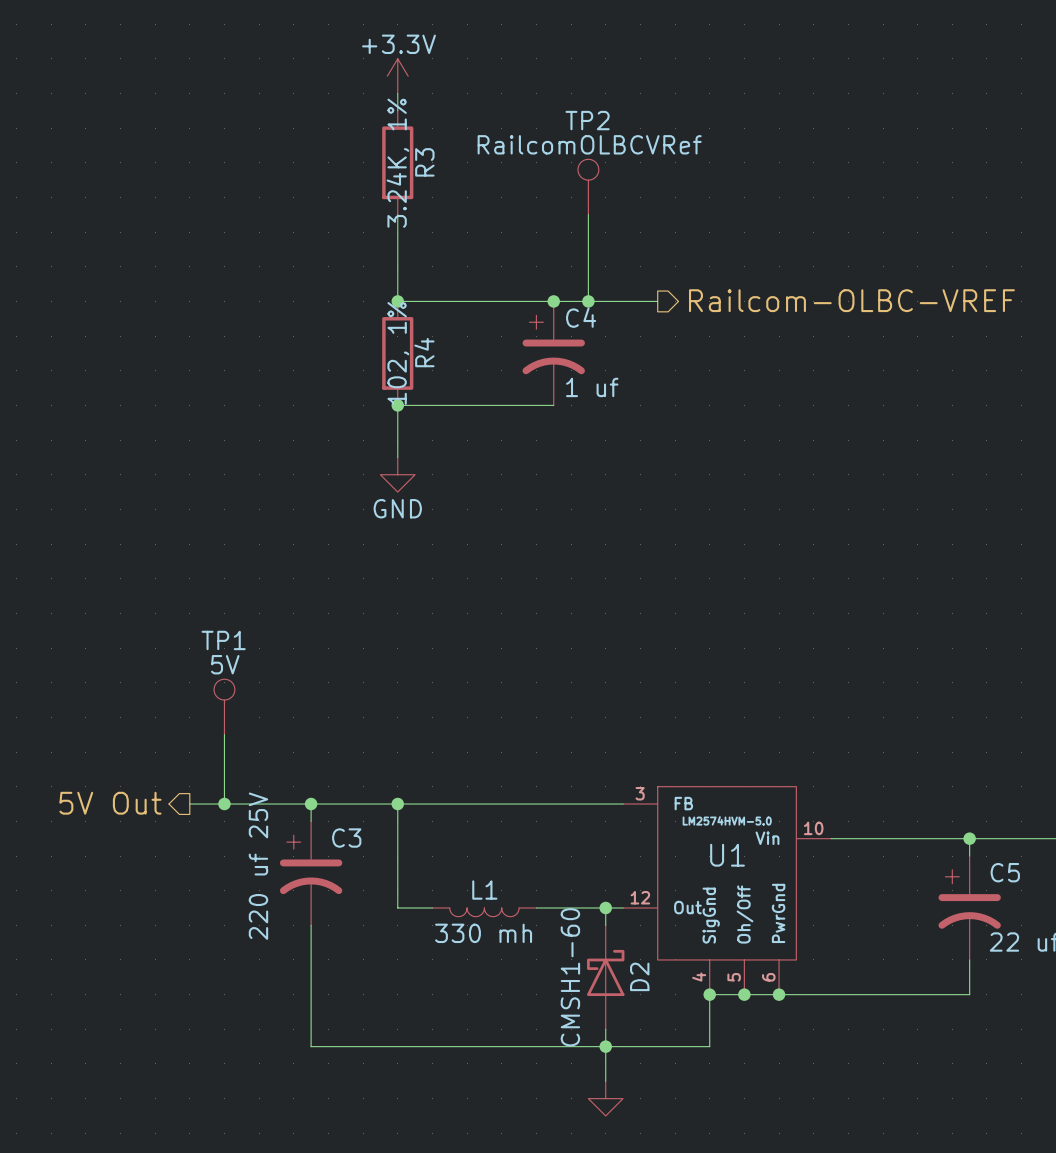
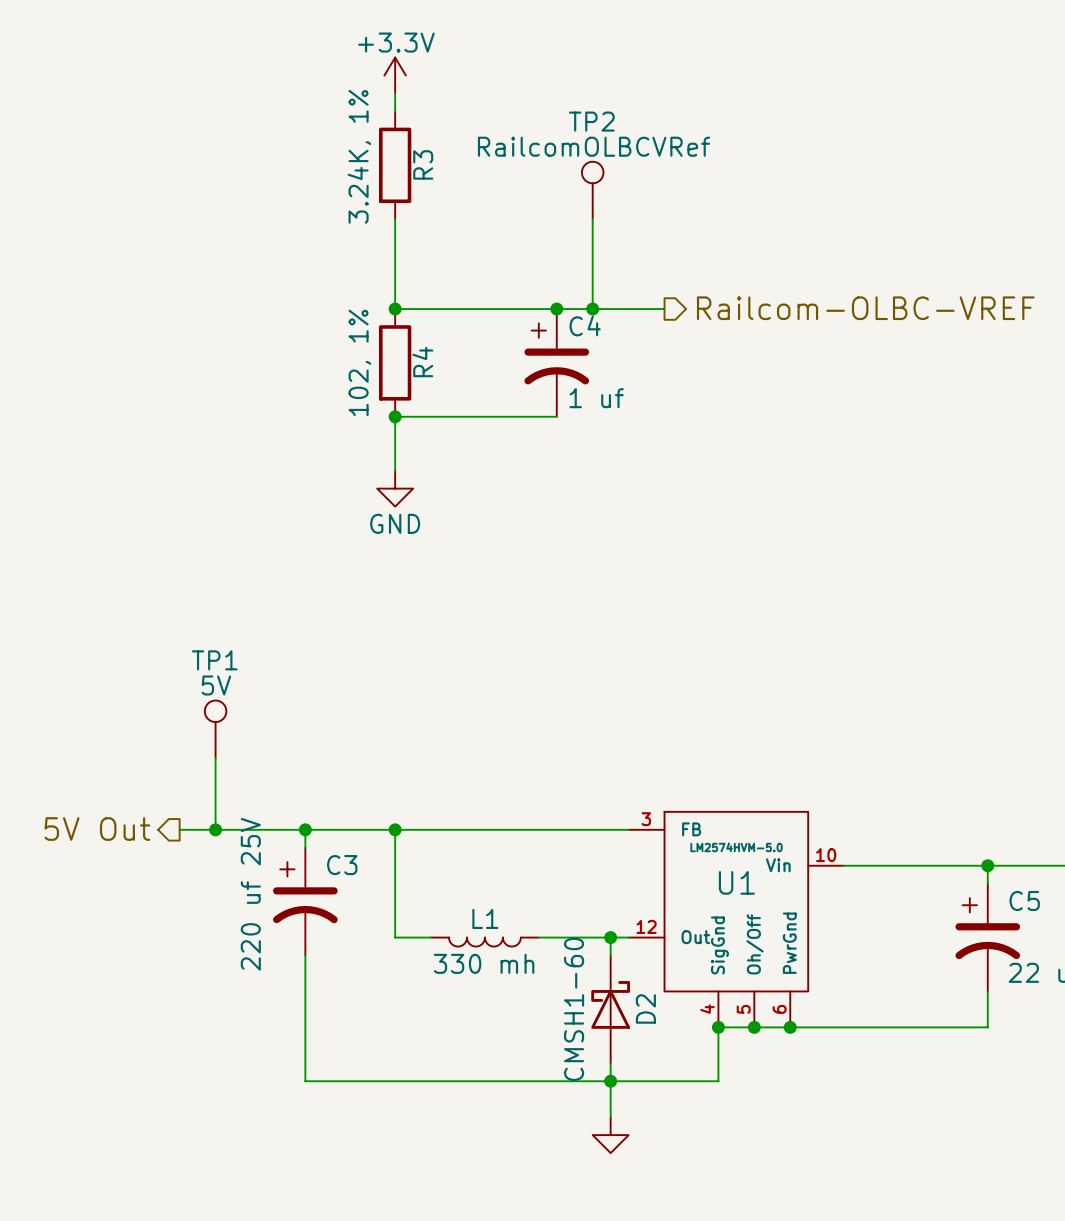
R3 value position: 3.24K, 1% (397, 163) -> 3.24K, 1% (359, 156)
R4 value position: 102, 1% (398, 353) -> 102, 1% (359, 362)

